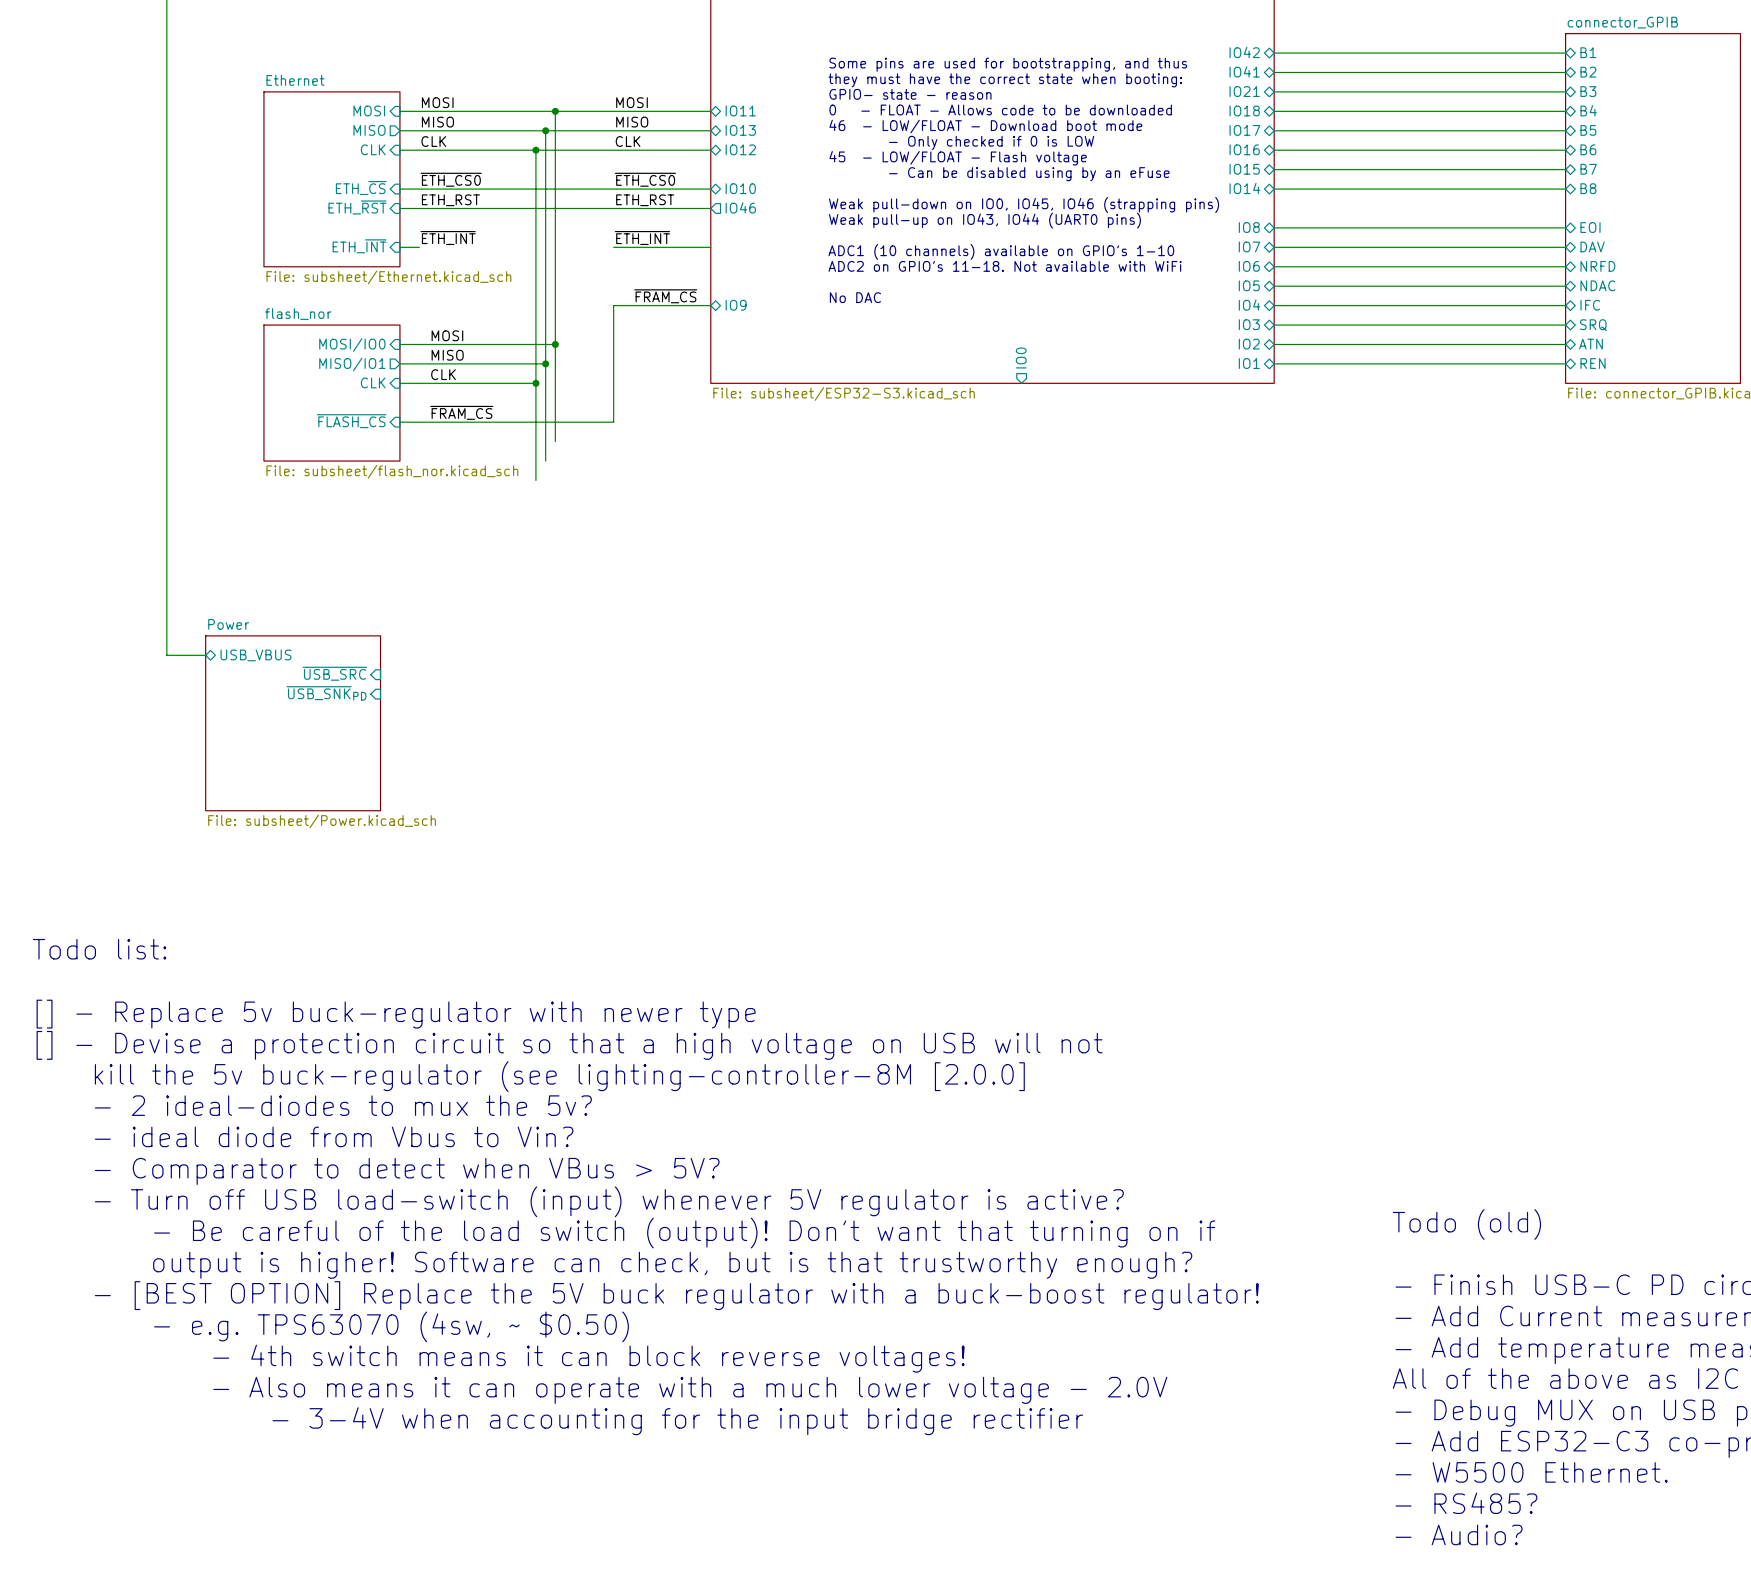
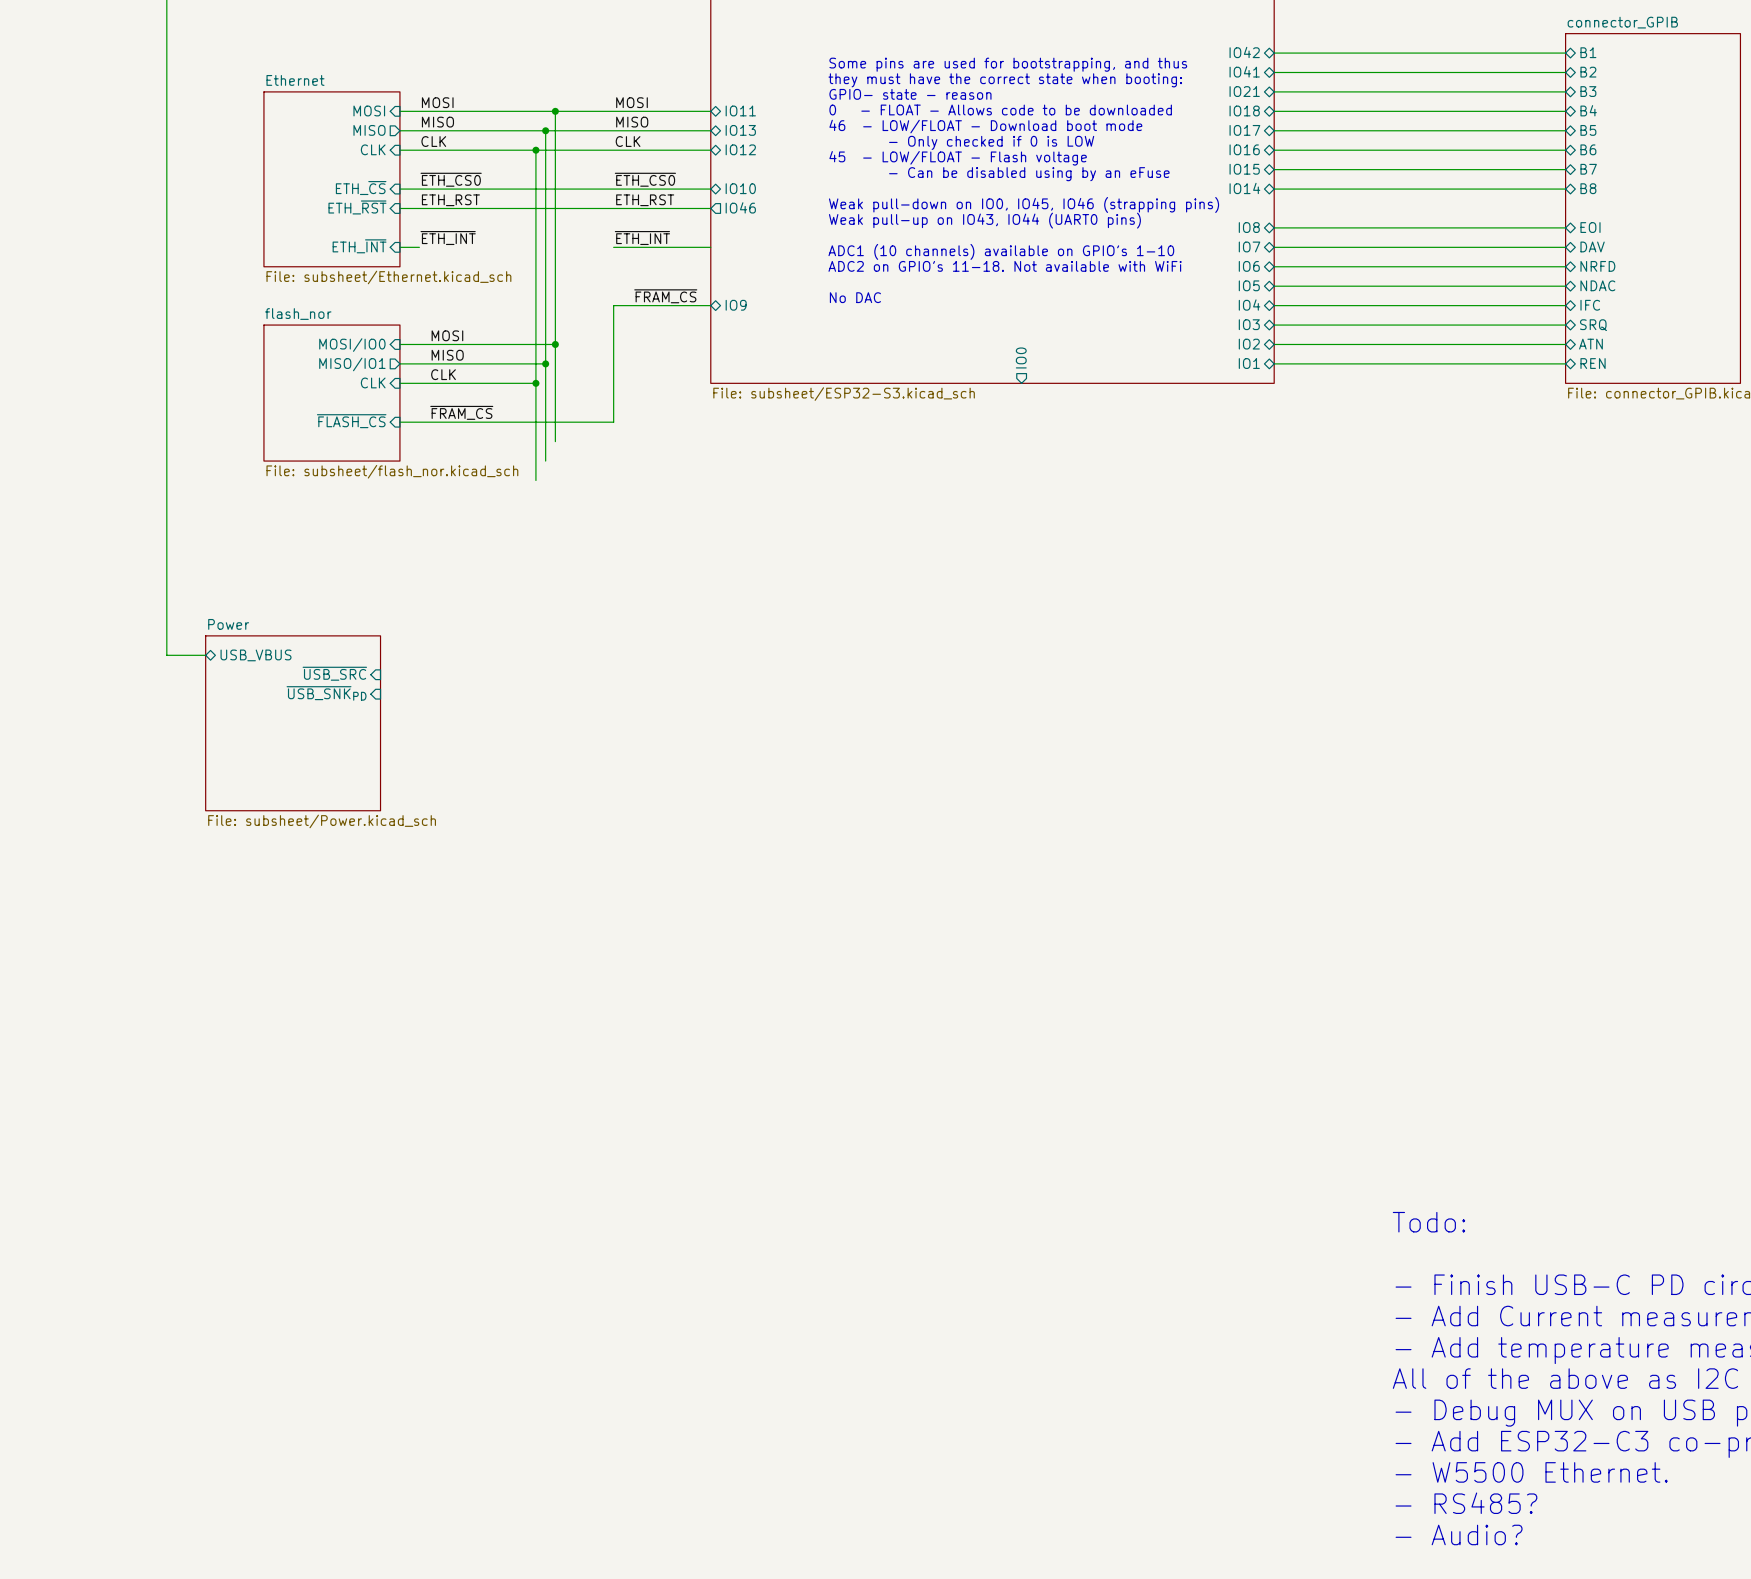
text: Todo list: (99, 949) -> none
text: [] - Replace 5v buck-regulator with newer type (396, 1014) -> none
text: [] - Devise a protection circuit so that a high voltage on USB will not (569, 1045) -> none
text: kill the 5v buck-regulator (see lighting-controller-8M [2.0.0] (559, 1076) -> none
text: - 2 ideal-diodes to mux the 5v? (343, 1105) -> none
text: - ideal diode from Vbus to Vin? (334, 1136) -> none
text: - Comparator to detect when VBus > 5V? (407, 1171) -> none
text: - Turn off USB load-switch (input) whenever 5V regulator is active? (609, 1201) -> none
text: Todo (old) (1466, 1224) -> Todo: (1428, 1222)
text: - Be careful of the load switch (output)! Don't want that turning on if (684, 1233) -> none
text: output is higher! Software can check, but is that trustworthy enough? (672, 1265) -> none
text: - [BEST OPTION] Replace the 5V buck regulator with a buck-boost regulator! (676, 1295) -> none
text: - e.g. TPS63070 (4sw, ~ $0.50) (391, 1326) -> none
text: - 4th switch means it can block reverse voltages! (588, 1358) -> none
text: - Also means it can operate with a much lower voltage - 2.0V (690, 1390) -> none
text: - 3-4V when accounting for the input bridge rectifier (677, 1421) -> none

